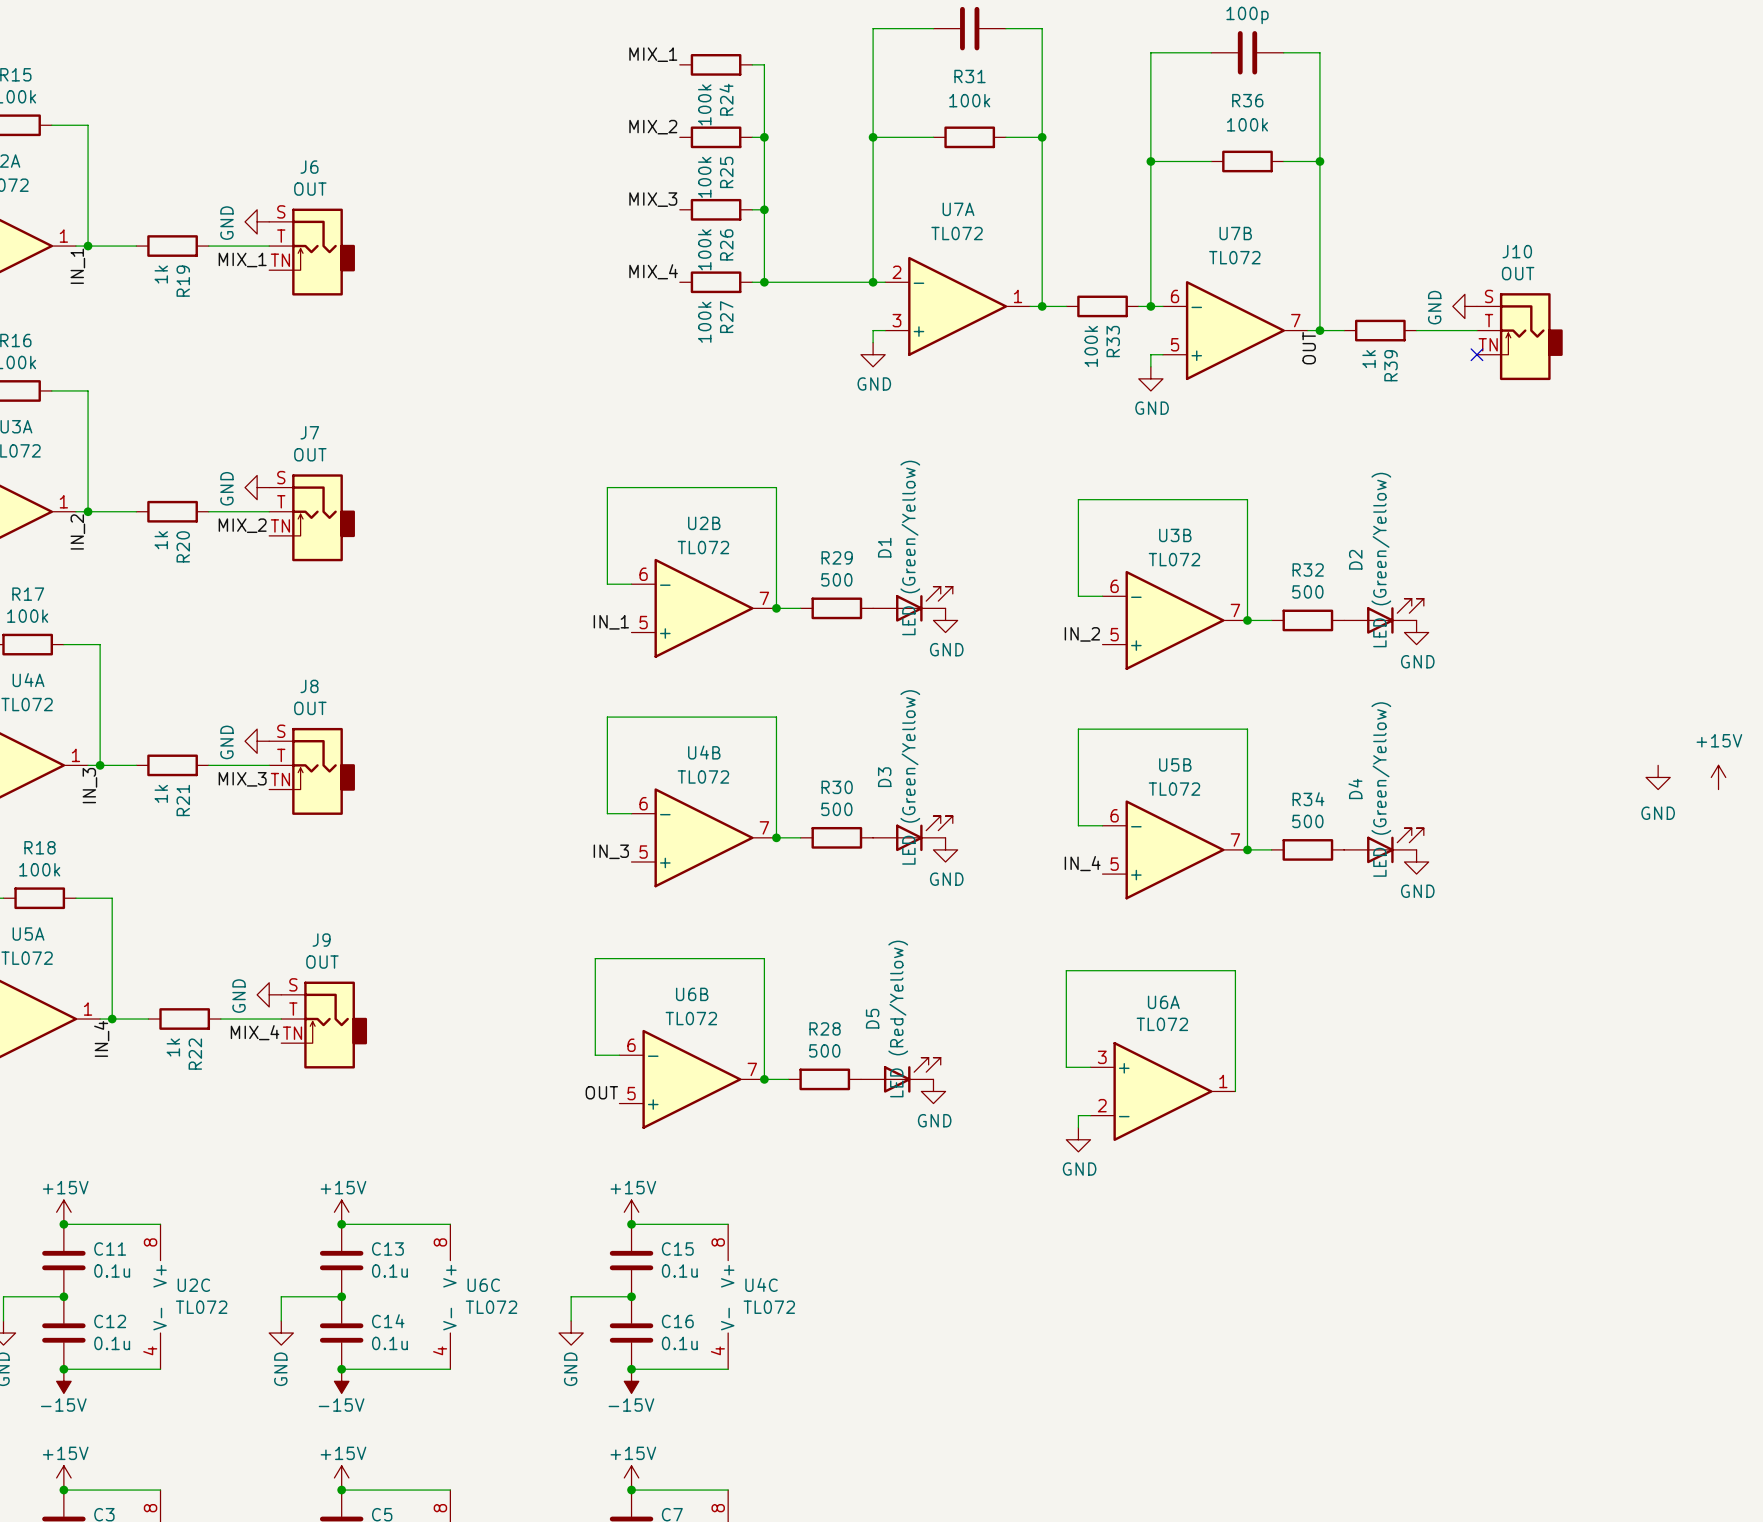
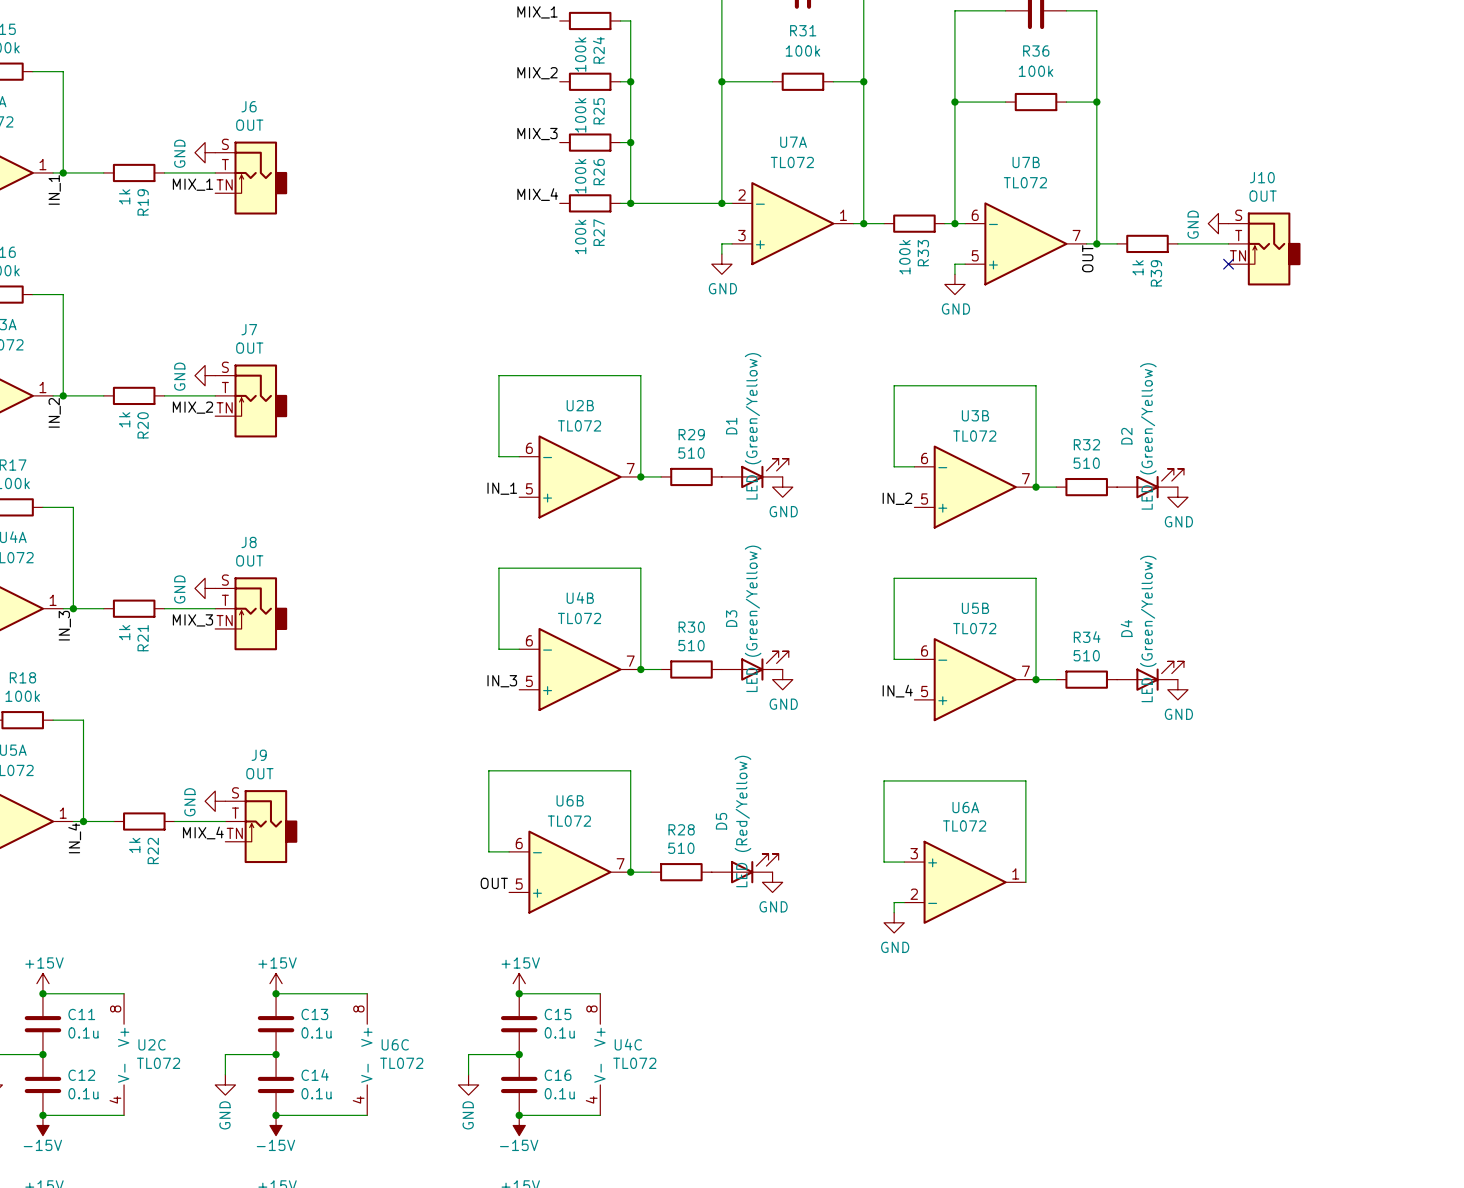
R29 value: 500 (836, 579) -> 510 (691, 453)
R32 value: 500 (1307, 591) -> 510 (1086, 463)
power symbol: GND (1658, 777) -> none
power symbol: +15V (1718, 777) -> none
R30 value: 500 (836, 809) -> 510 (691, 645)
R34 value: 500 (1307, 821) -> 510 (1086, 655)
R28 value: 500 (824, 1050) -> 510 (681, 848)

